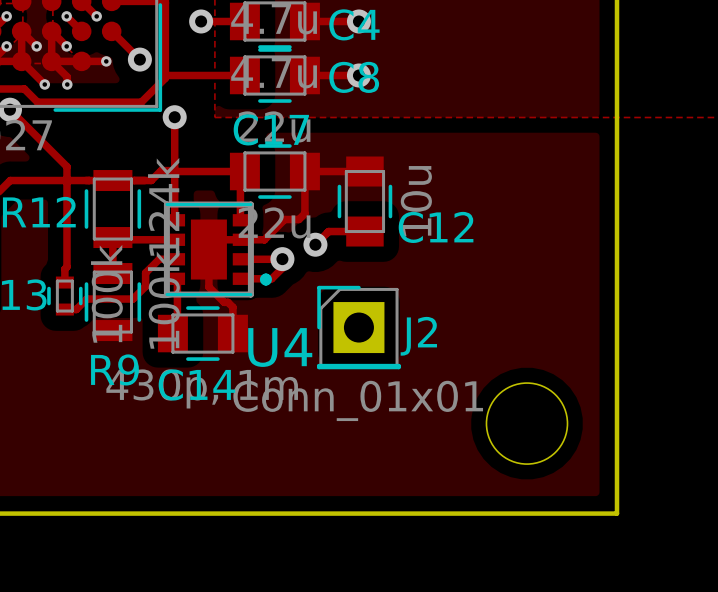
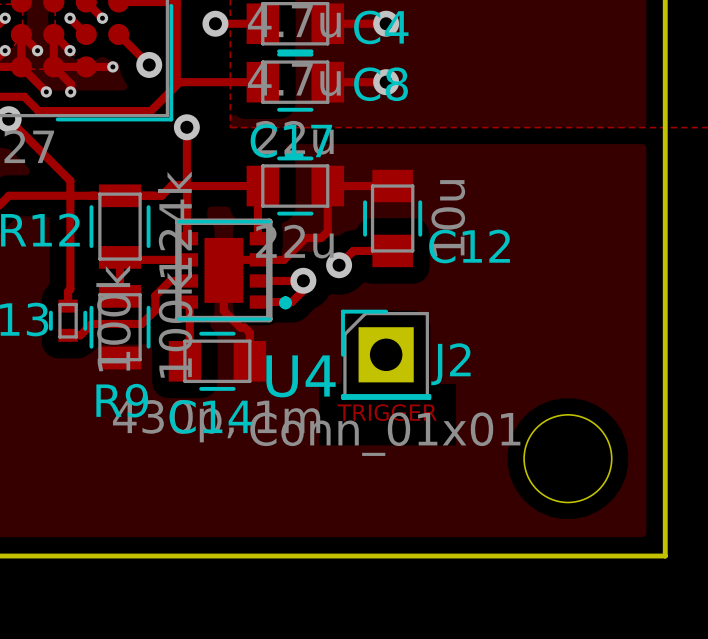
text: none -> TRIGGER (387, 412)

